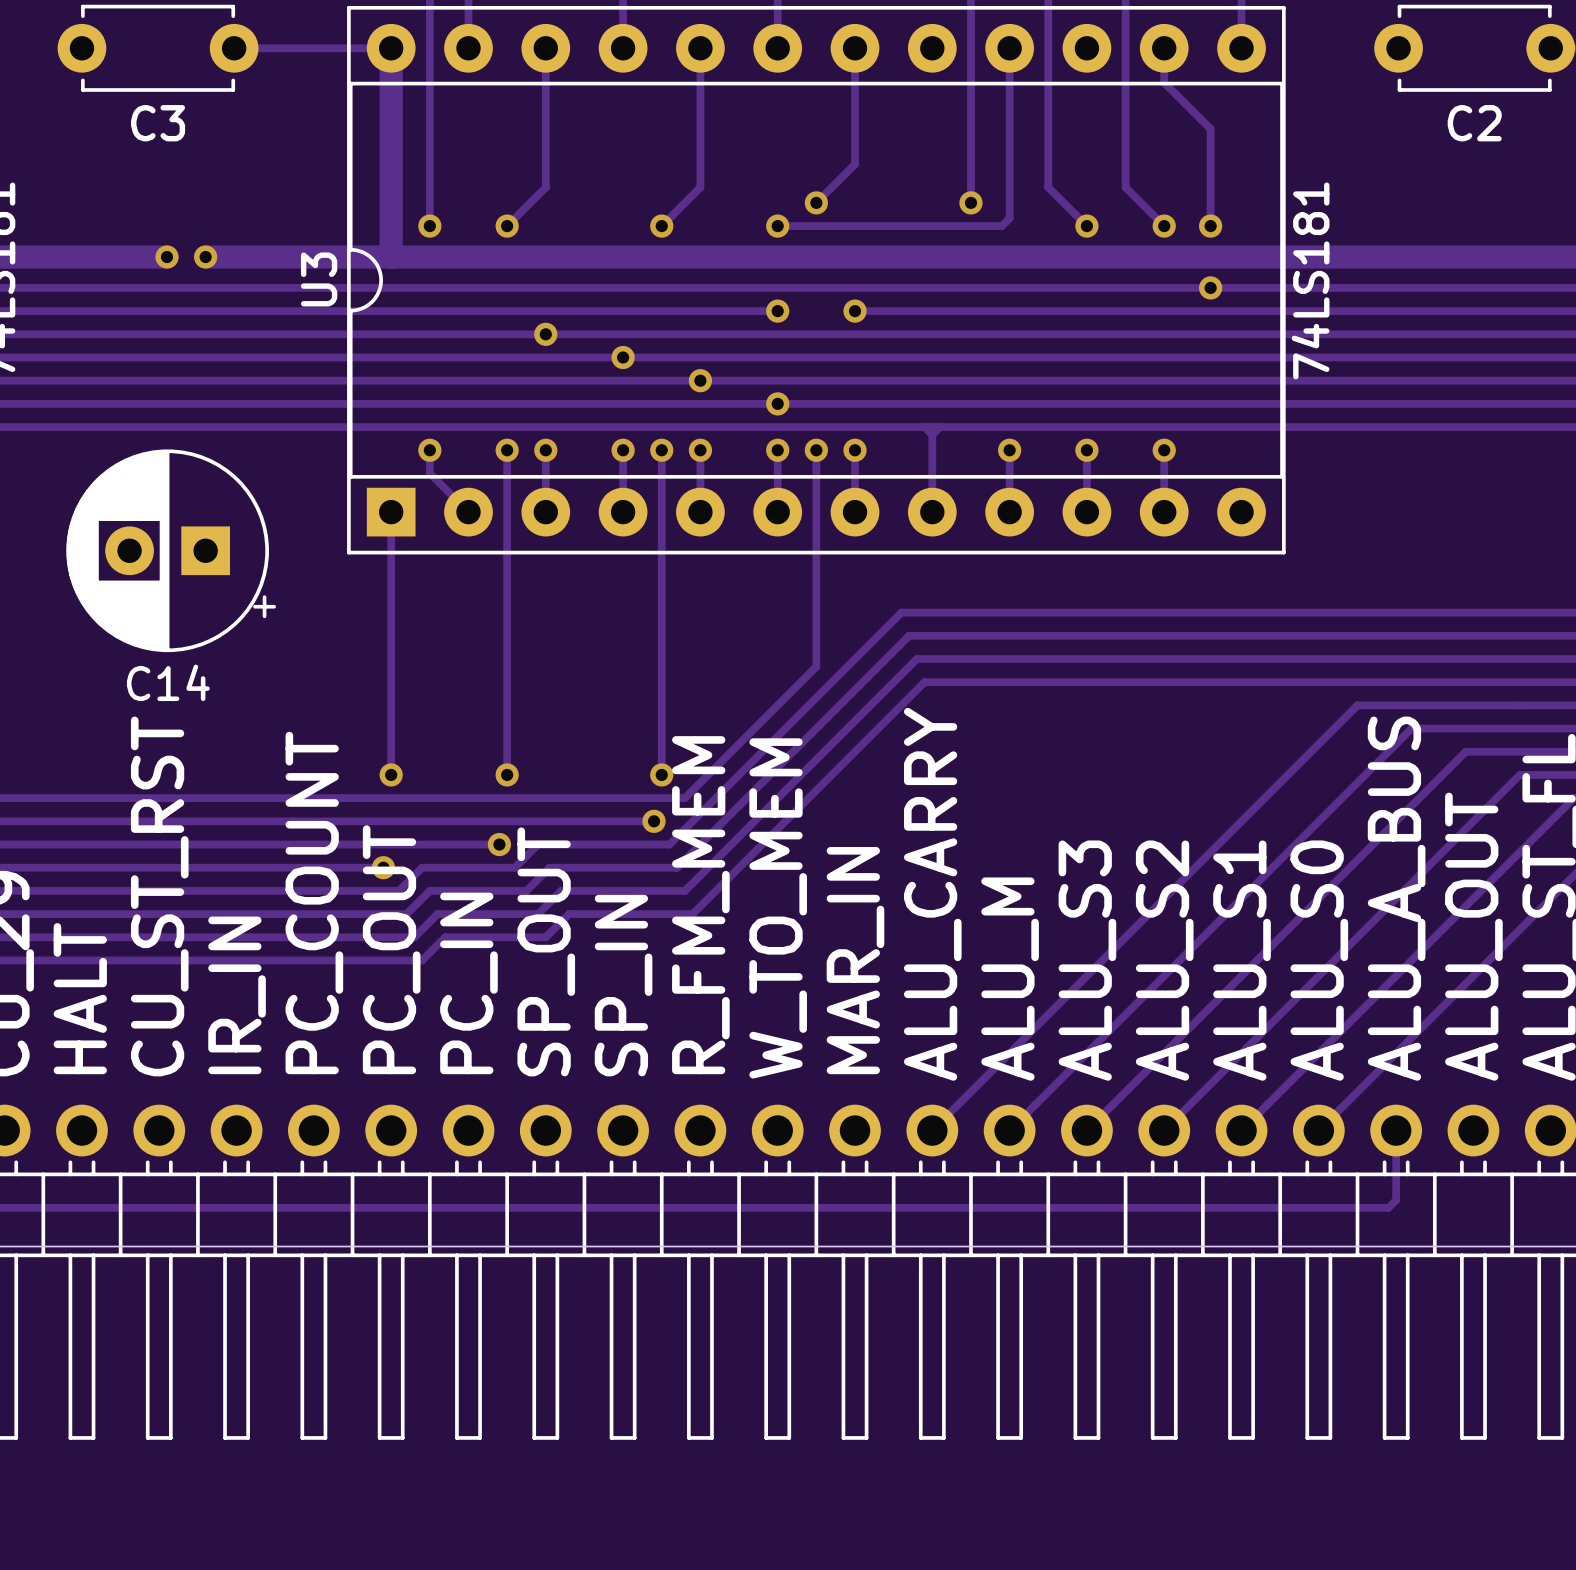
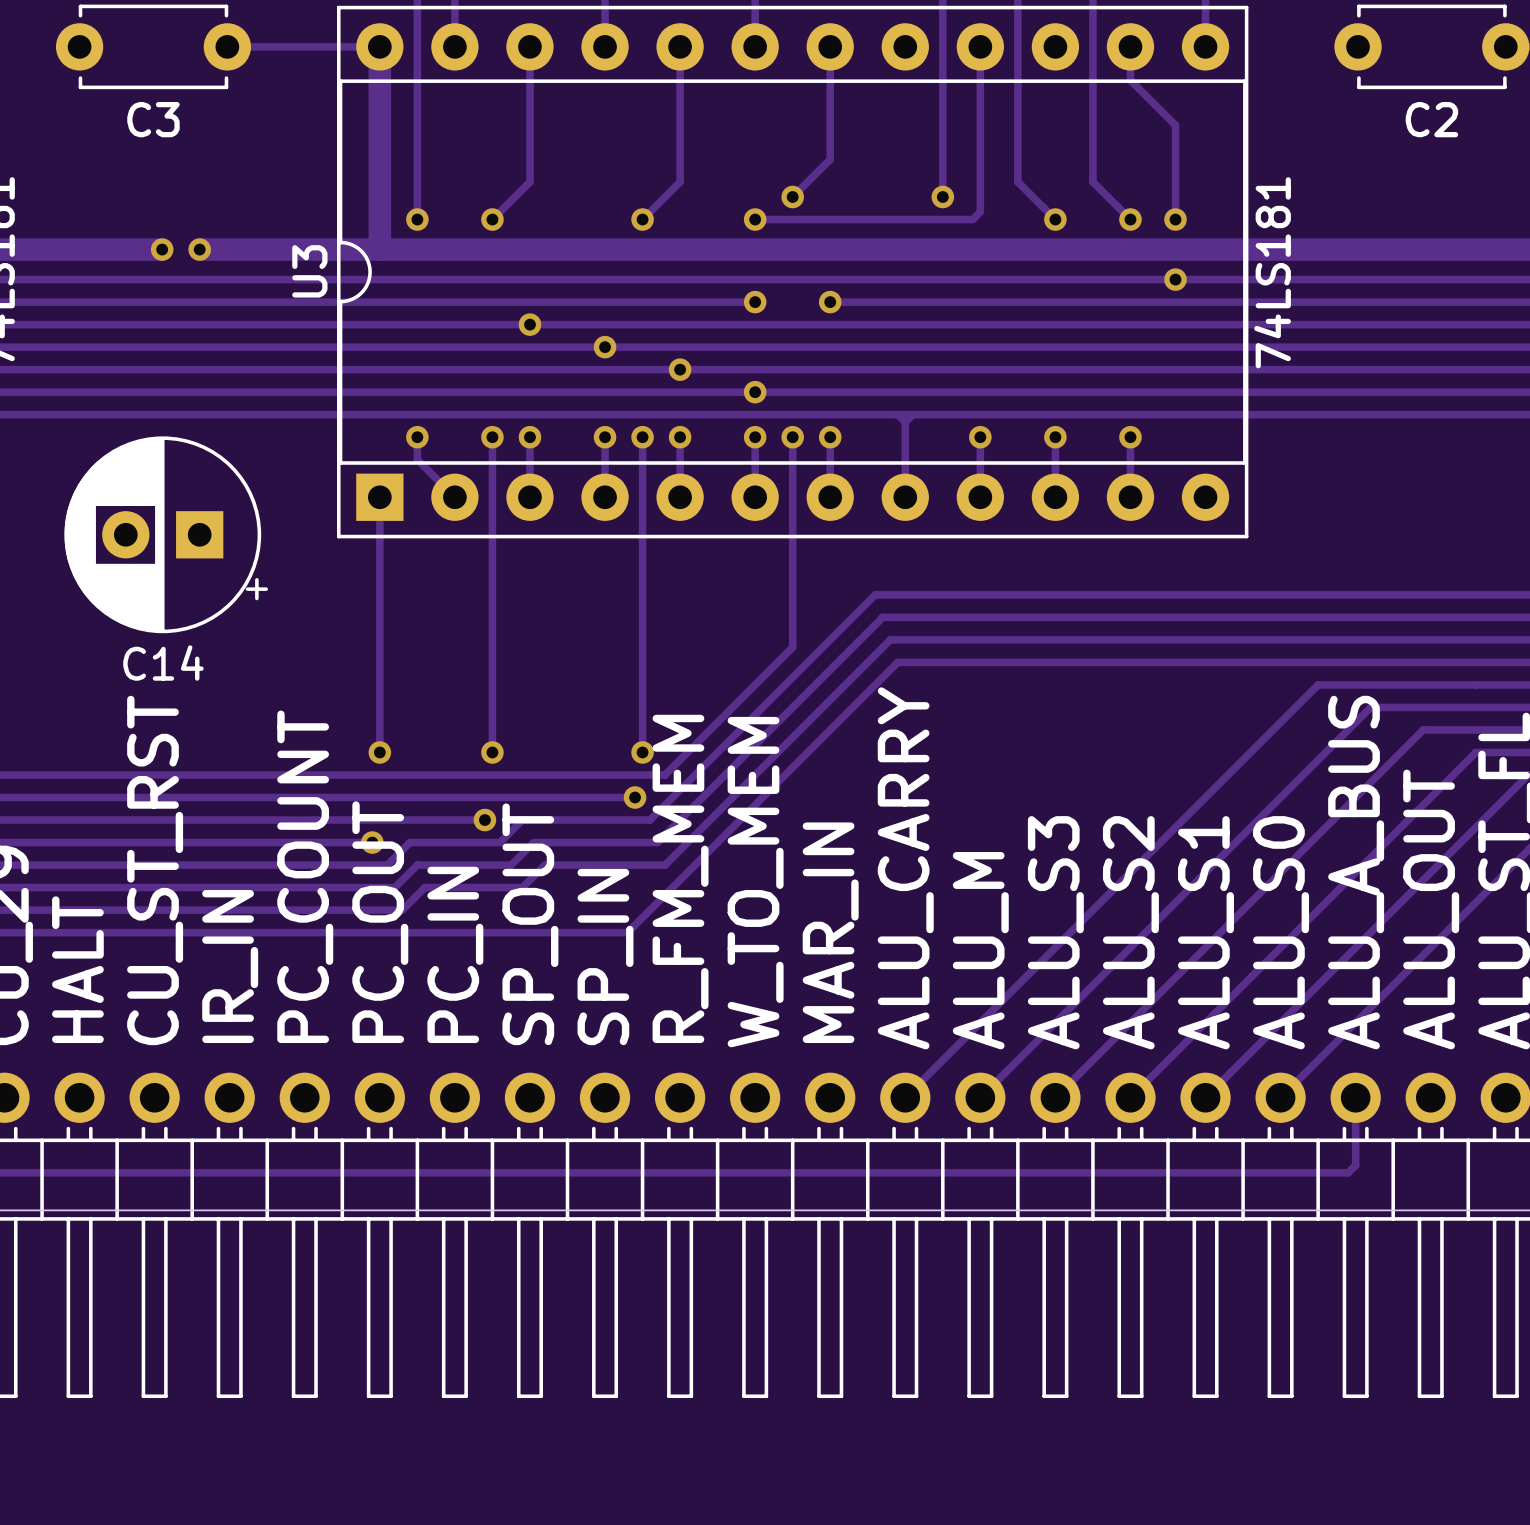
track: (692, 914) (568, 914) (545, 937) (445, 937) (422, 960) -> (672, 887) (627, 932) (409, 932)

